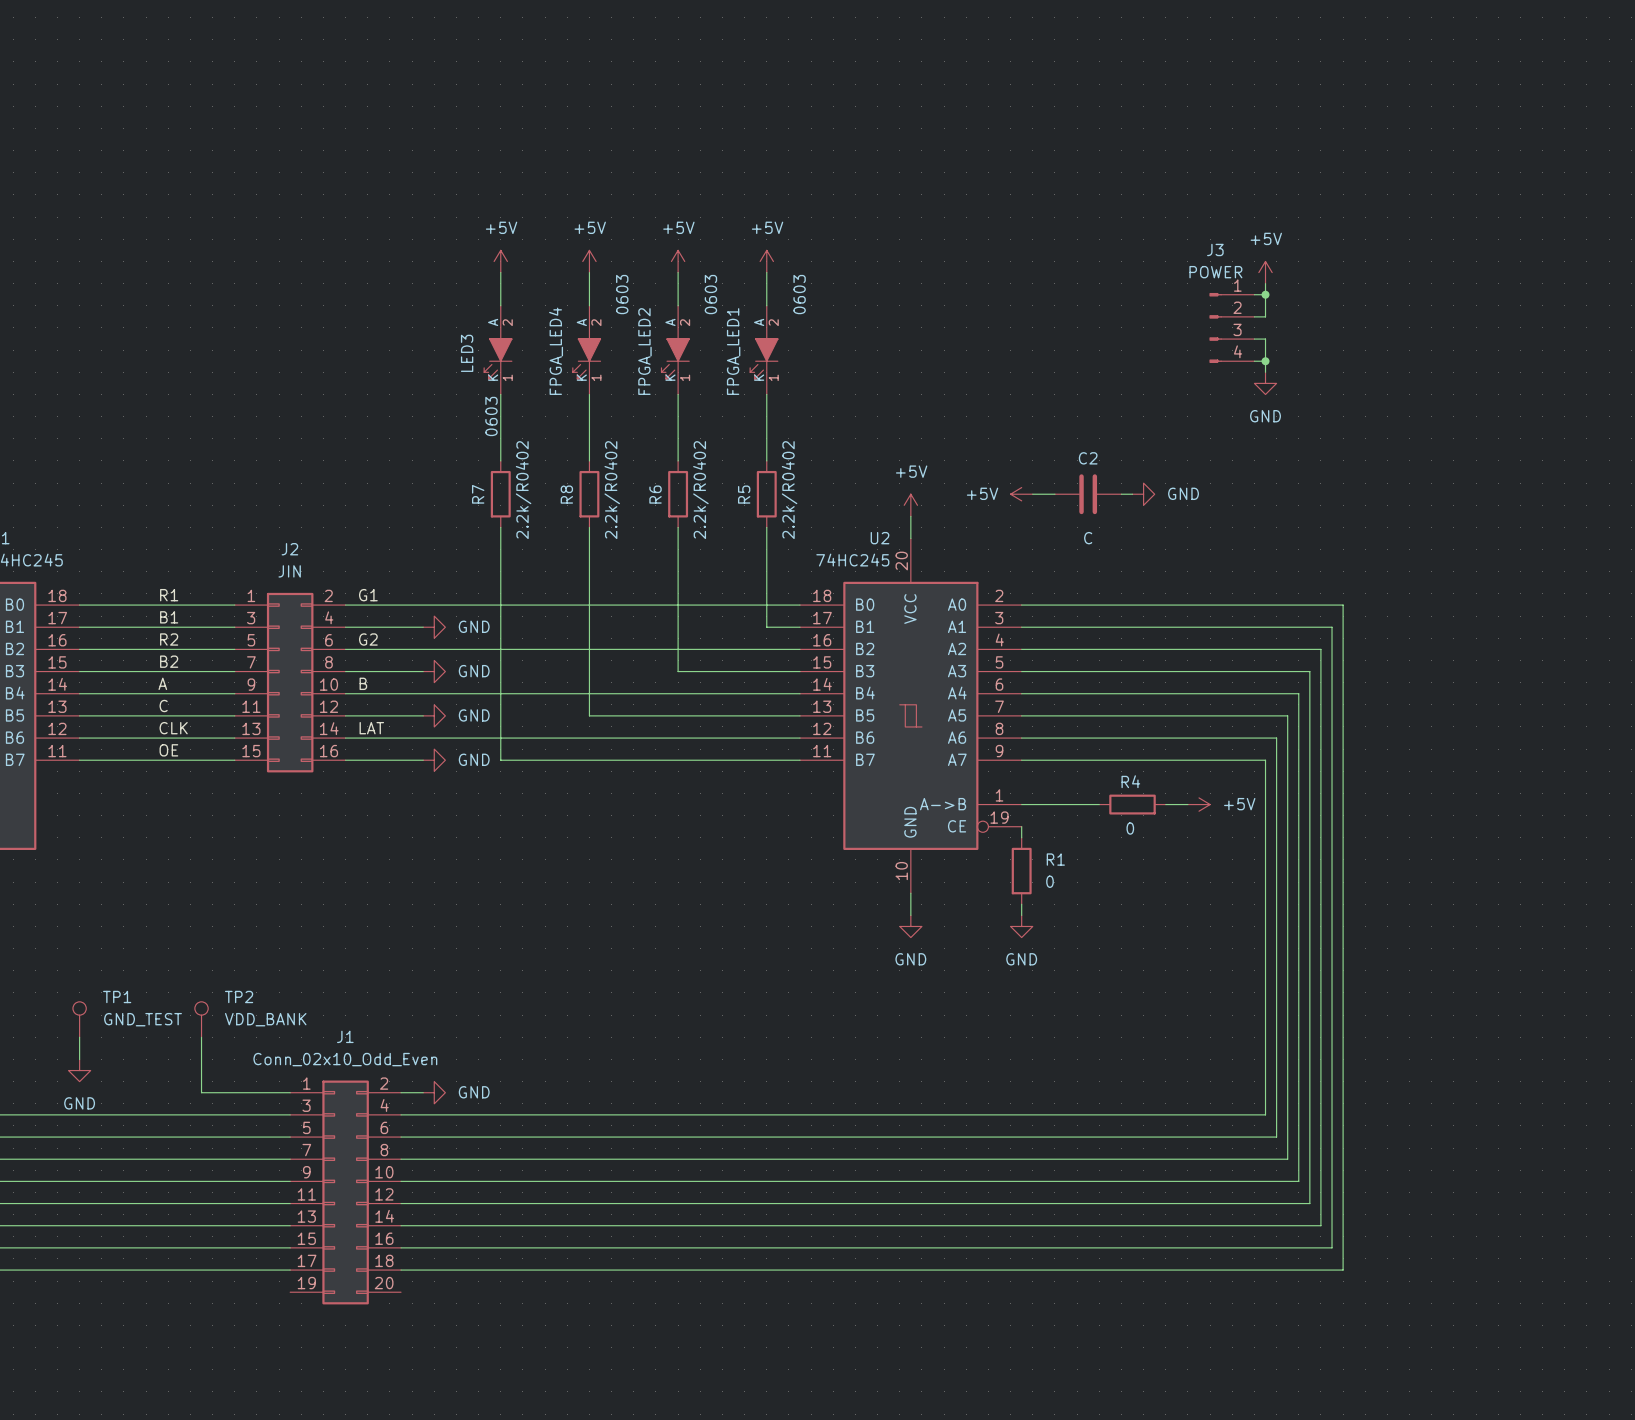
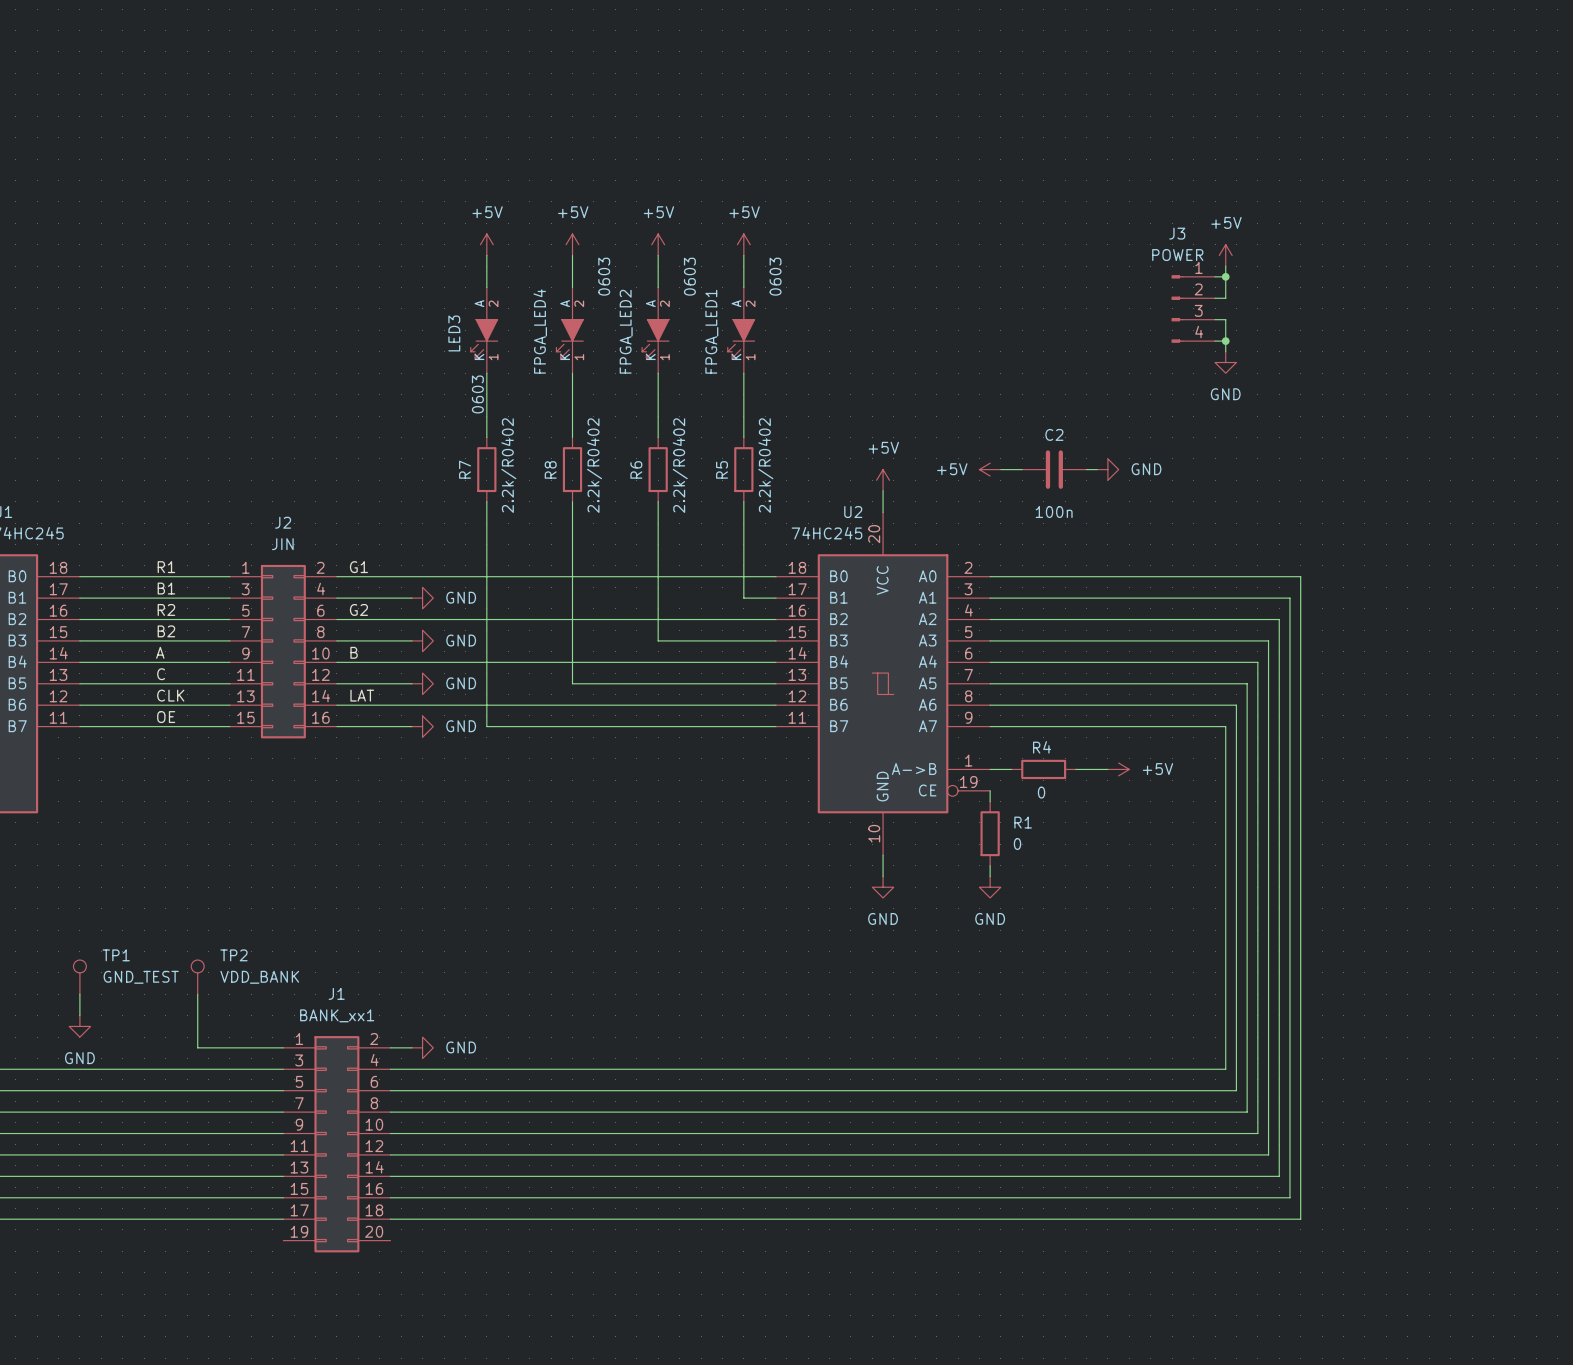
C2 value: C (1088, 538) -> 100n (1054, 512)
wire: (1043, 804) (1099, 804) -> none
wire: none -> (1075, 769) (1107, 769)
R4 position: (1132, 804) -> (1043, 769)
wire: (1165, 804) (1187, 804) -> none
power symbol position: +5V (1199, 804) -> +5V (1118, 769)
J1 value: Conn_02x10_Odd_Even (345, 1059) -> BANK_xx1 (337, 1015)

